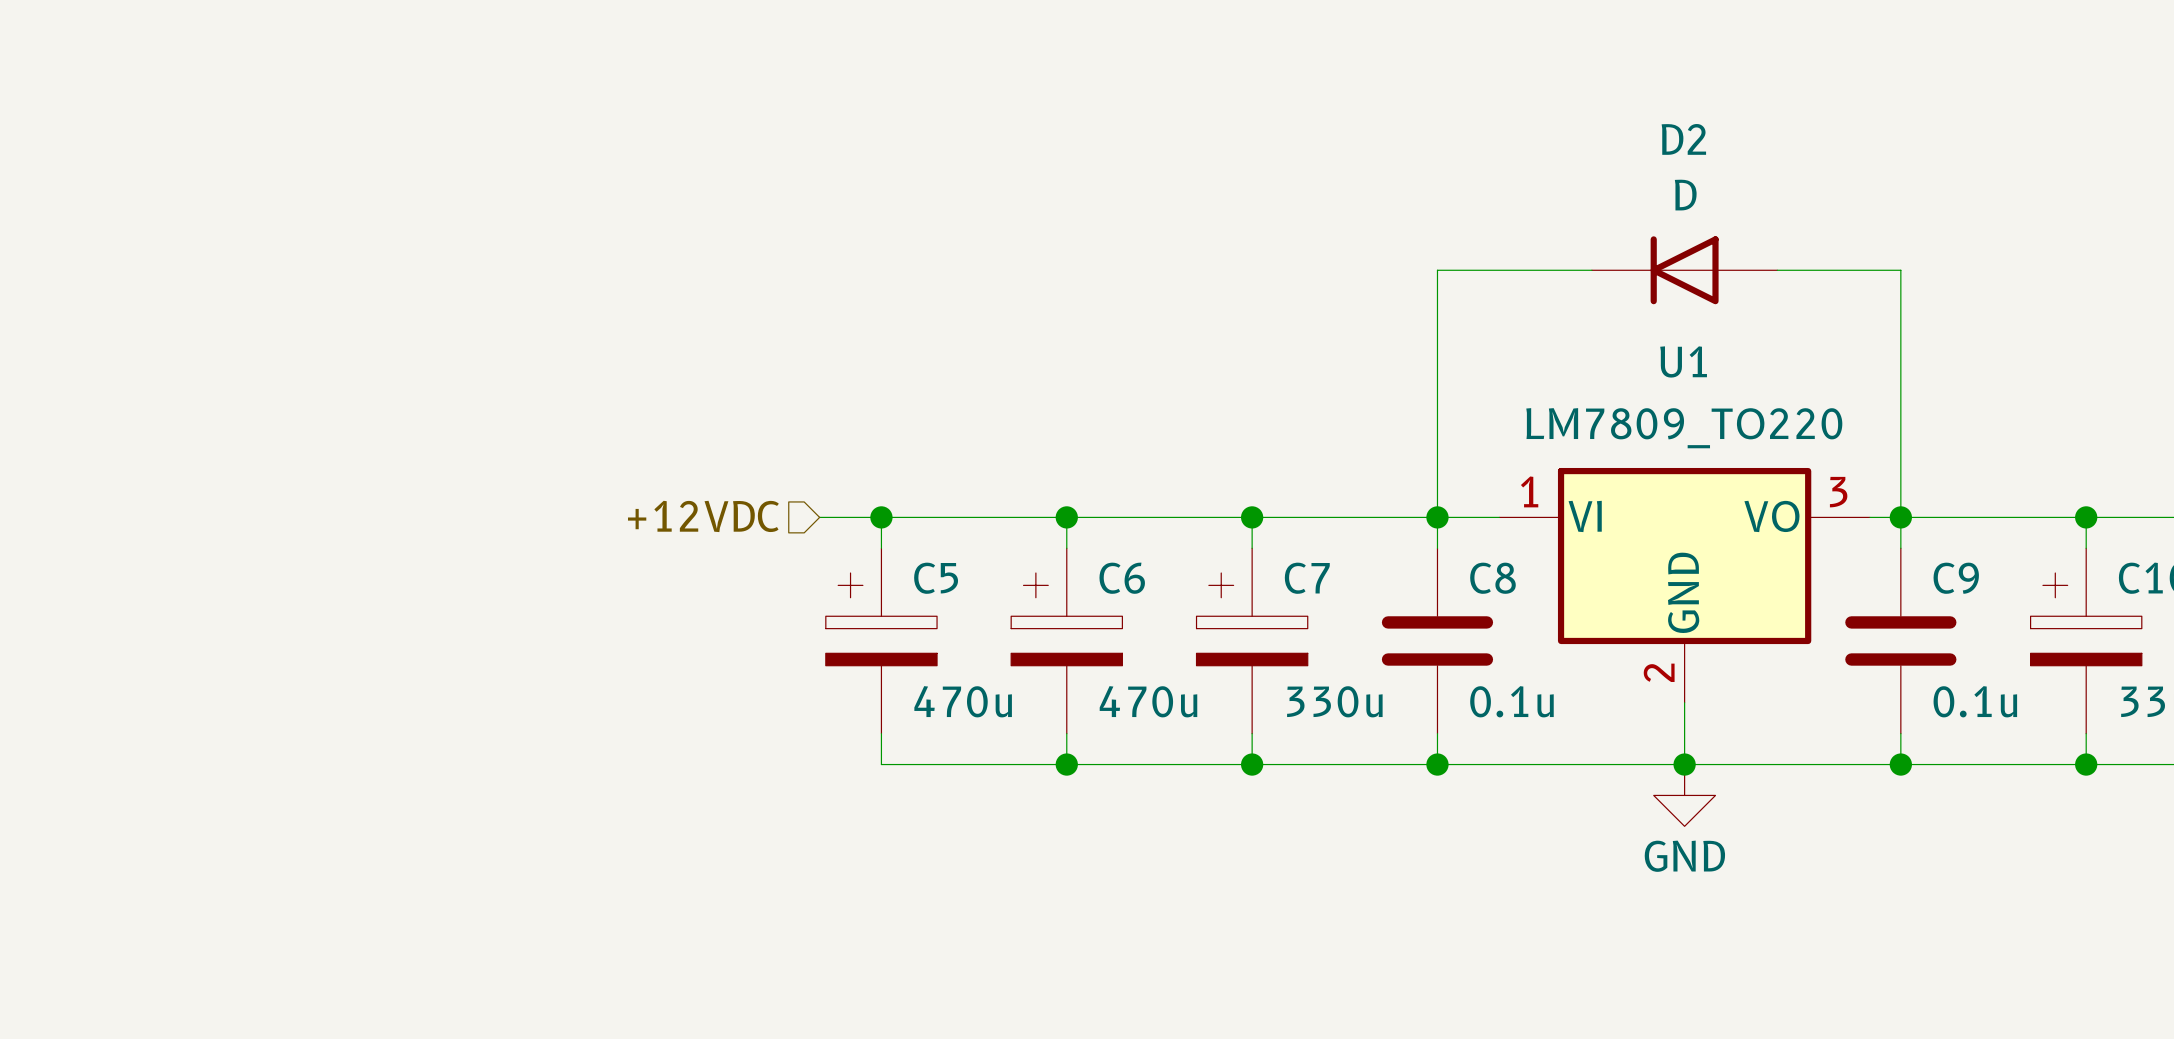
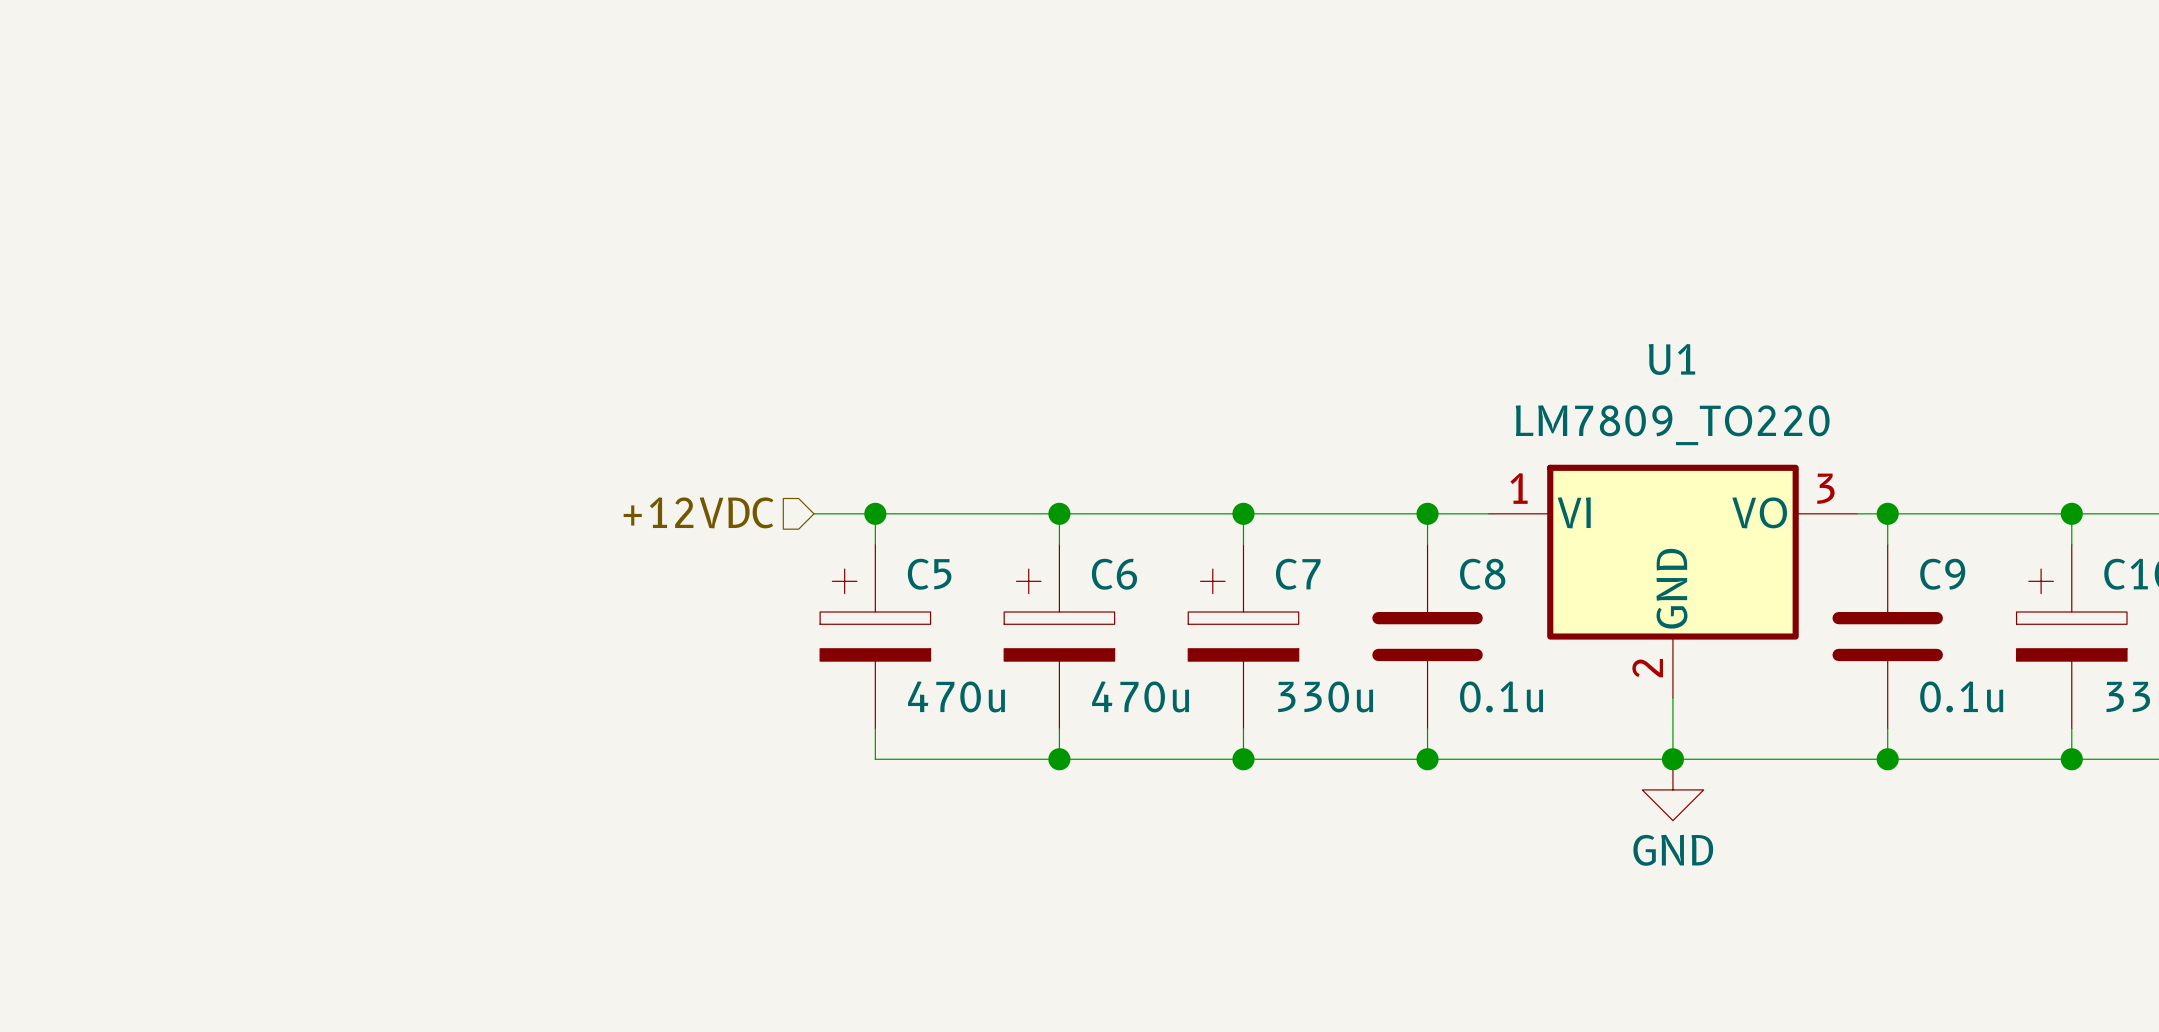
wire: (1591, 270) (1437, 270) (1437, 517) -> none
D2: D (1684, 270) -> none
wire: (1777, 270) (1900, 270) (1900, 517) -> none

